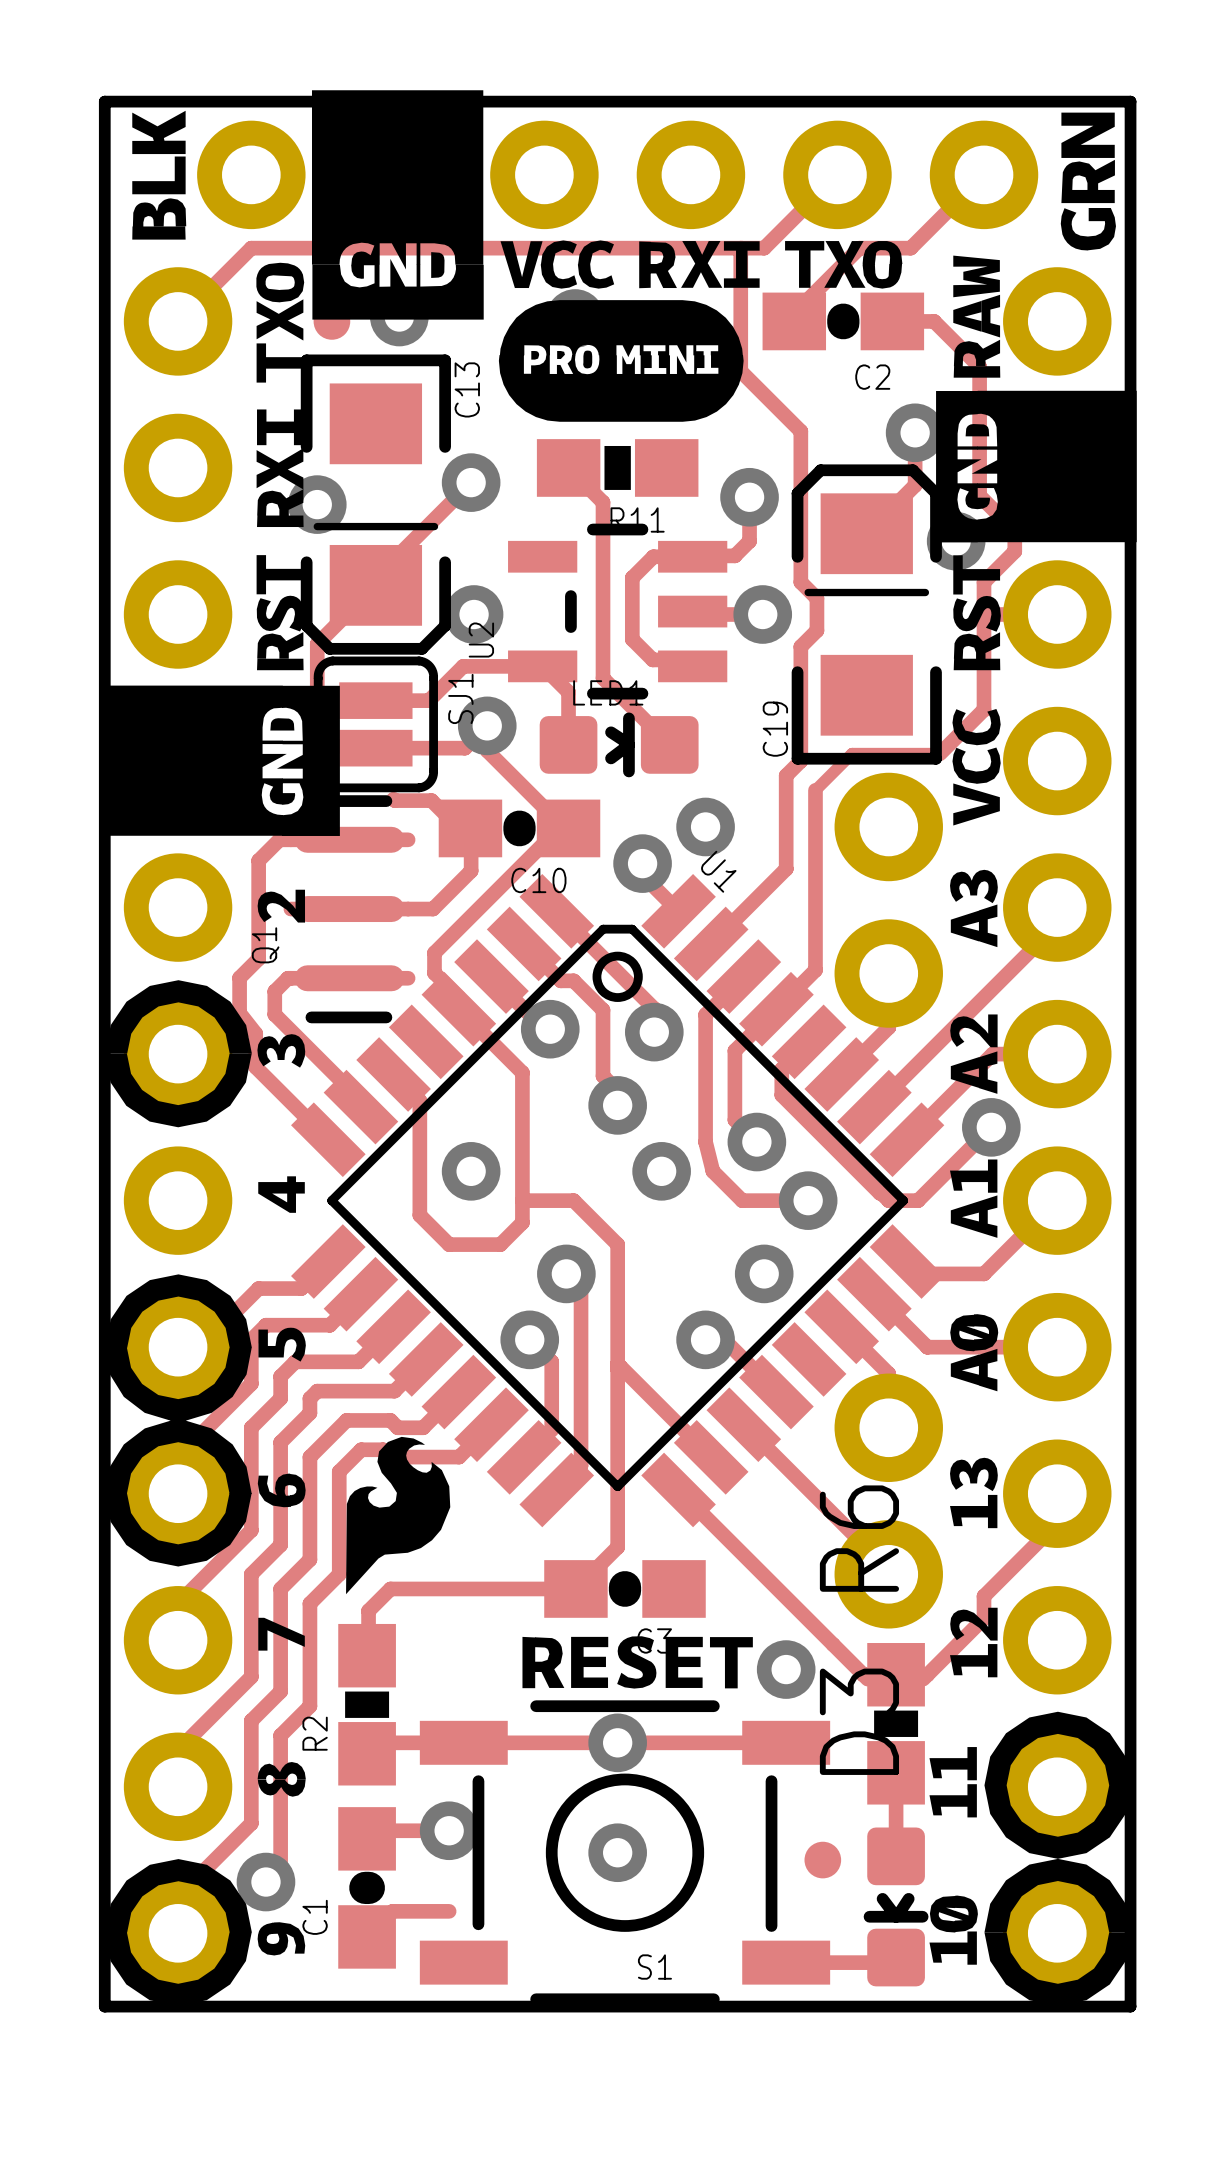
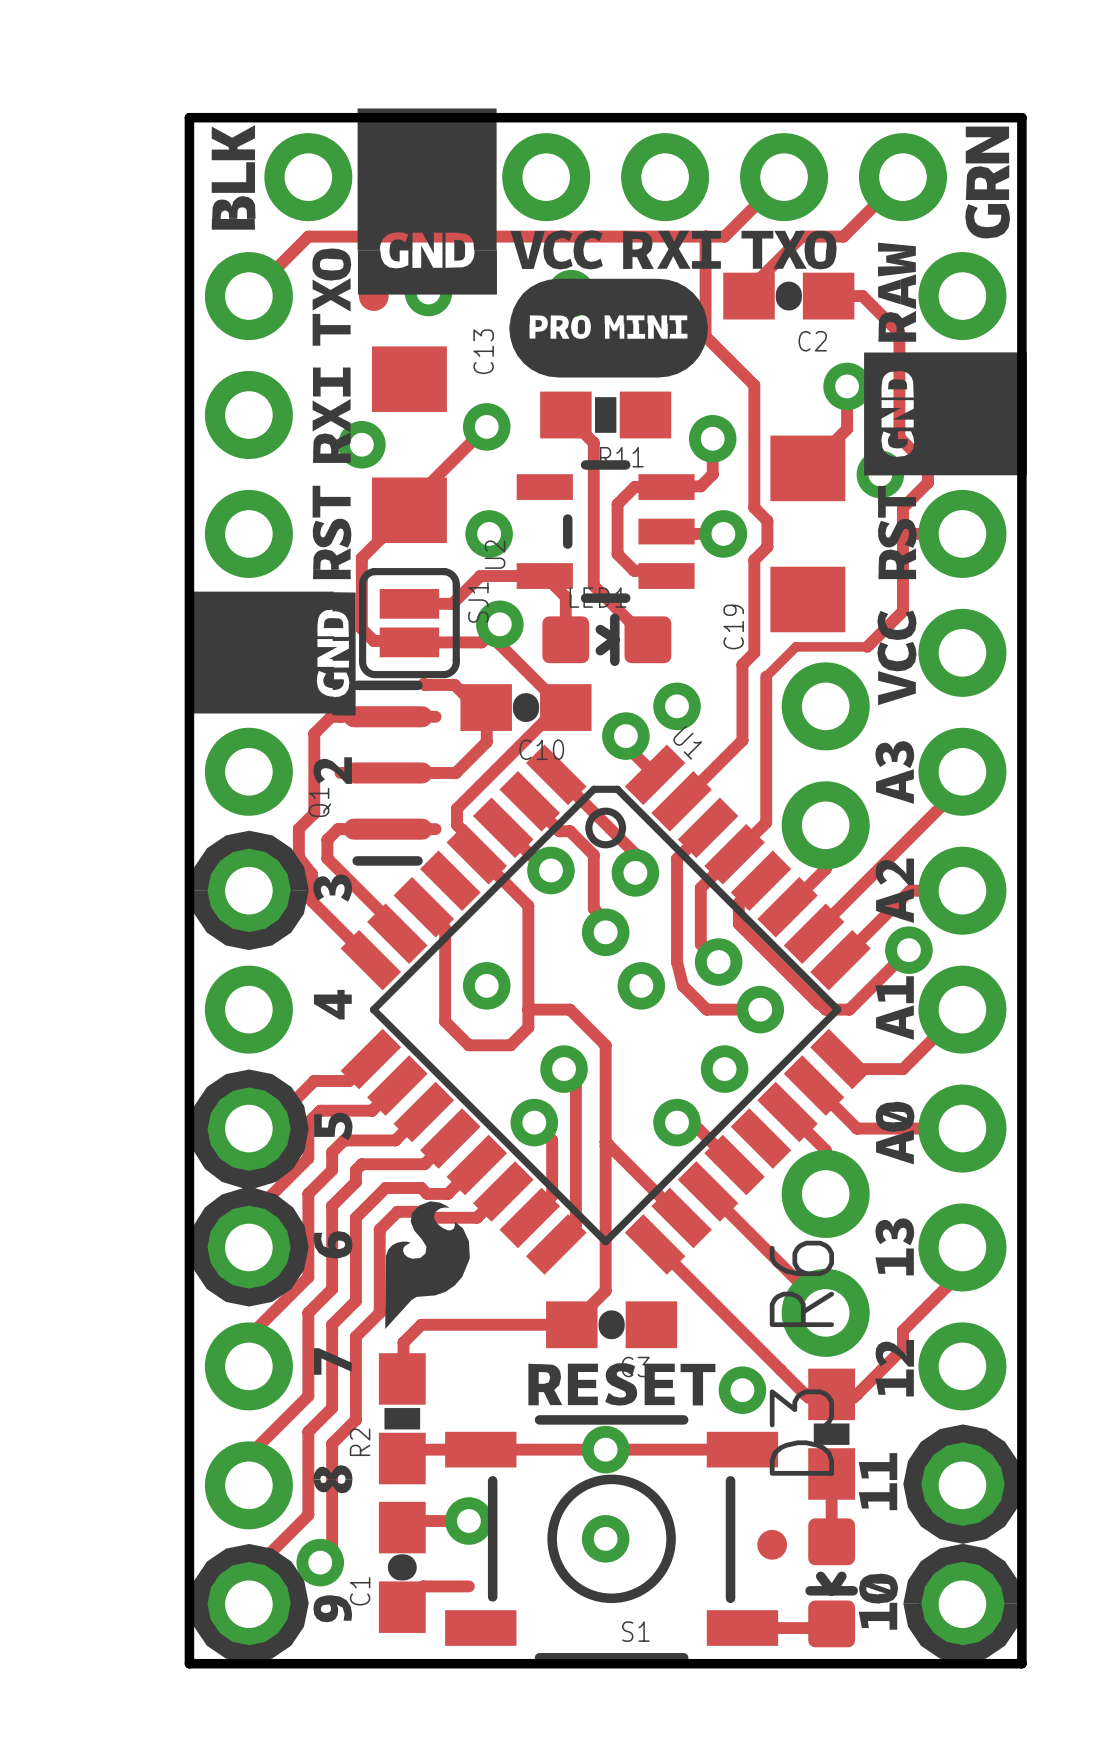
C13 footprint: [300, 354, 451, 655] -> [371, 346, 447, 544]
C19 footprint: [791, 464, 942, 765] -> [770, 435, 846, 633]
drawing shape: [282, 685, 340, 836] -> [332, 592, 356, 716]

